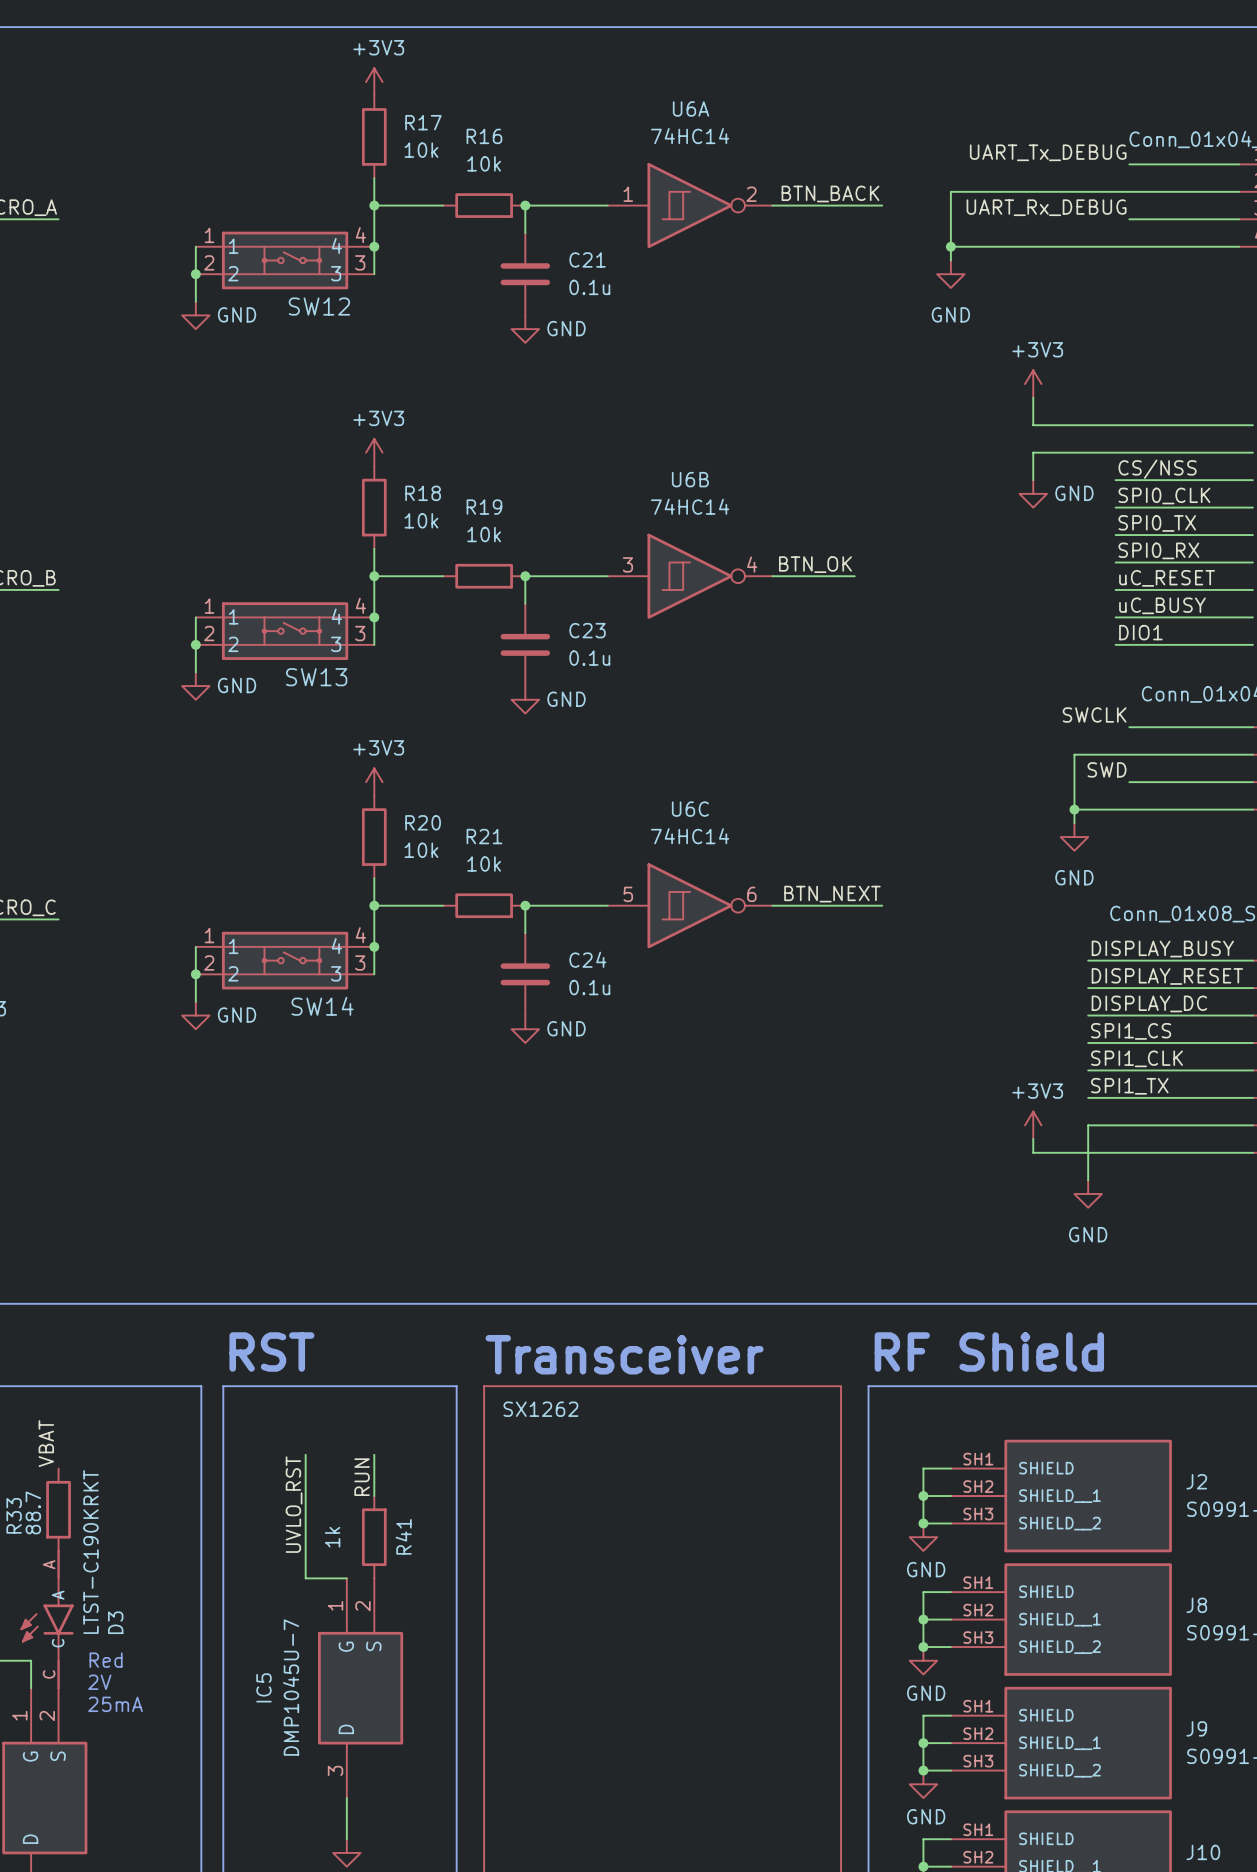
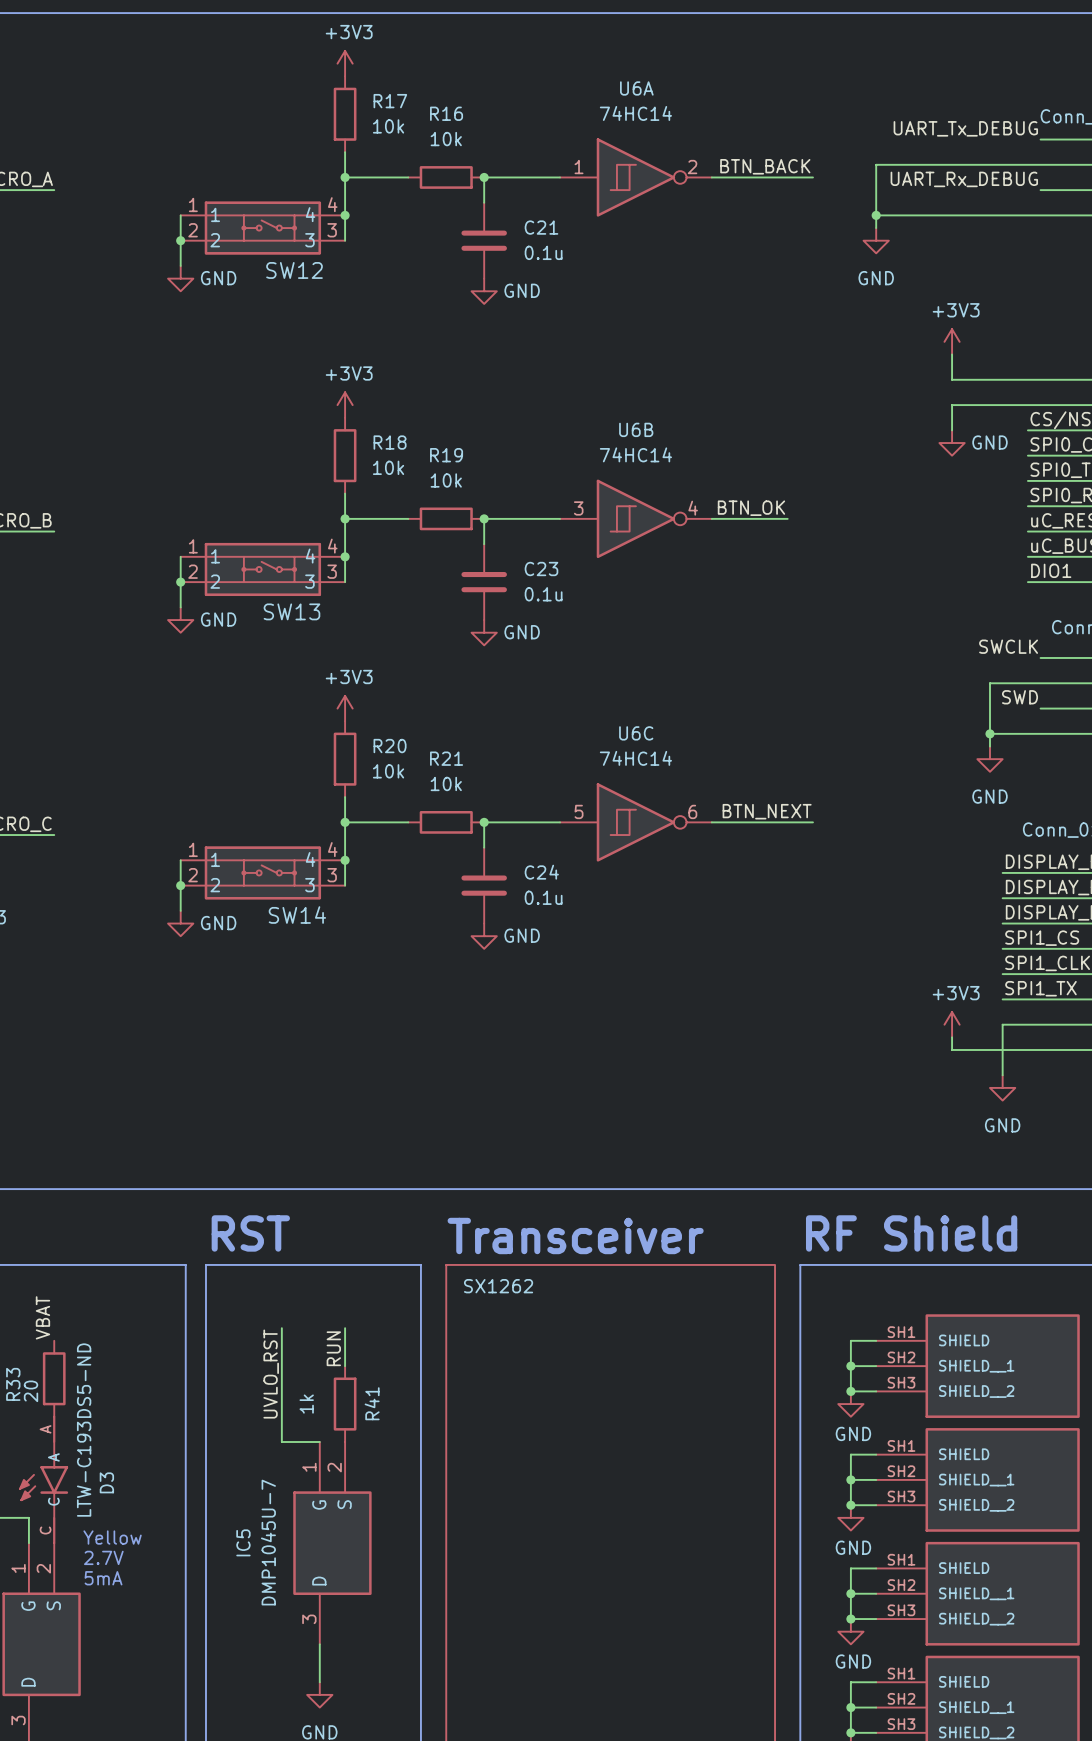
R33 value: 88.7 (33, 1512) -> 20 (31, 1391)
D3 value: LTST-C190KRKT (90, 1552) -> LTW-C193DS5-ND (84, 1430)
text: Red (106, 1660) -> none
text: 2V (99, 1682) -> Yellow (112, 1537)
text: 25mA (115, 1704) -> 2.7V (103, 1557)
text: none -> 5mA (103, 1578)

